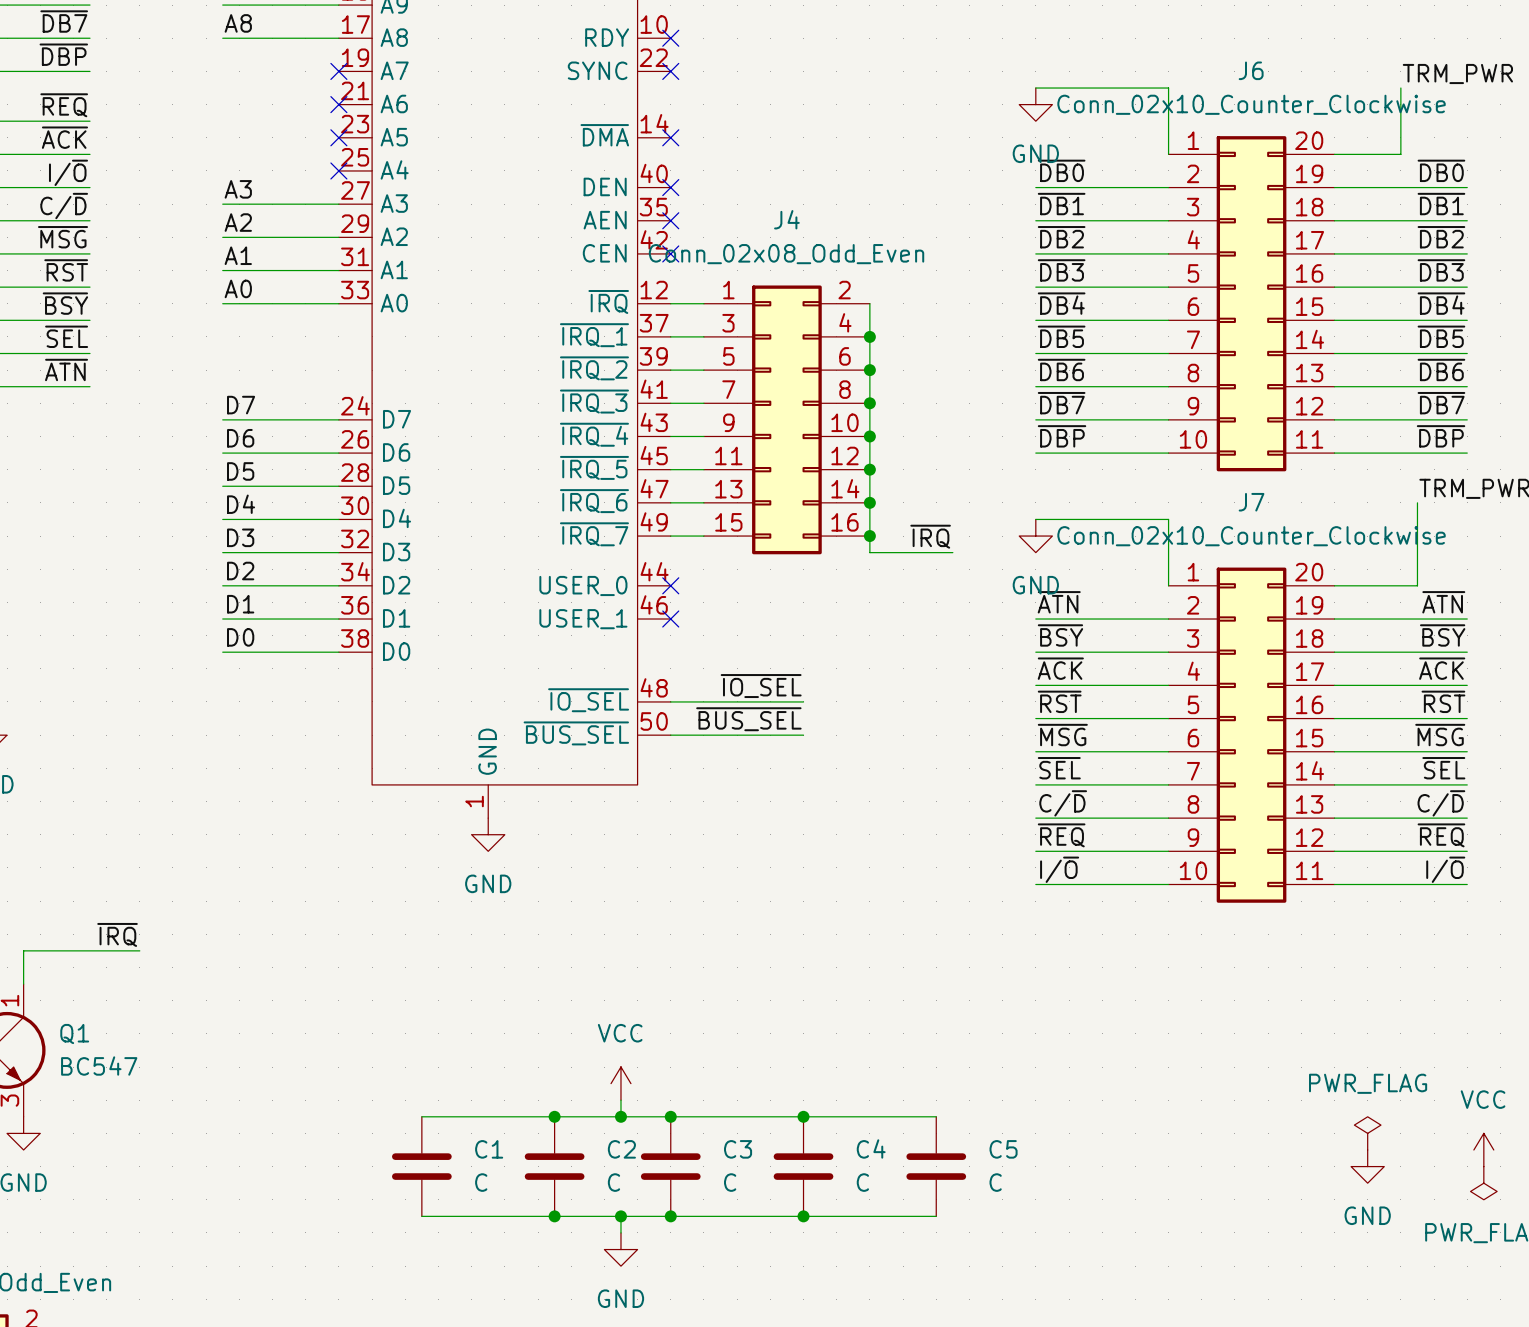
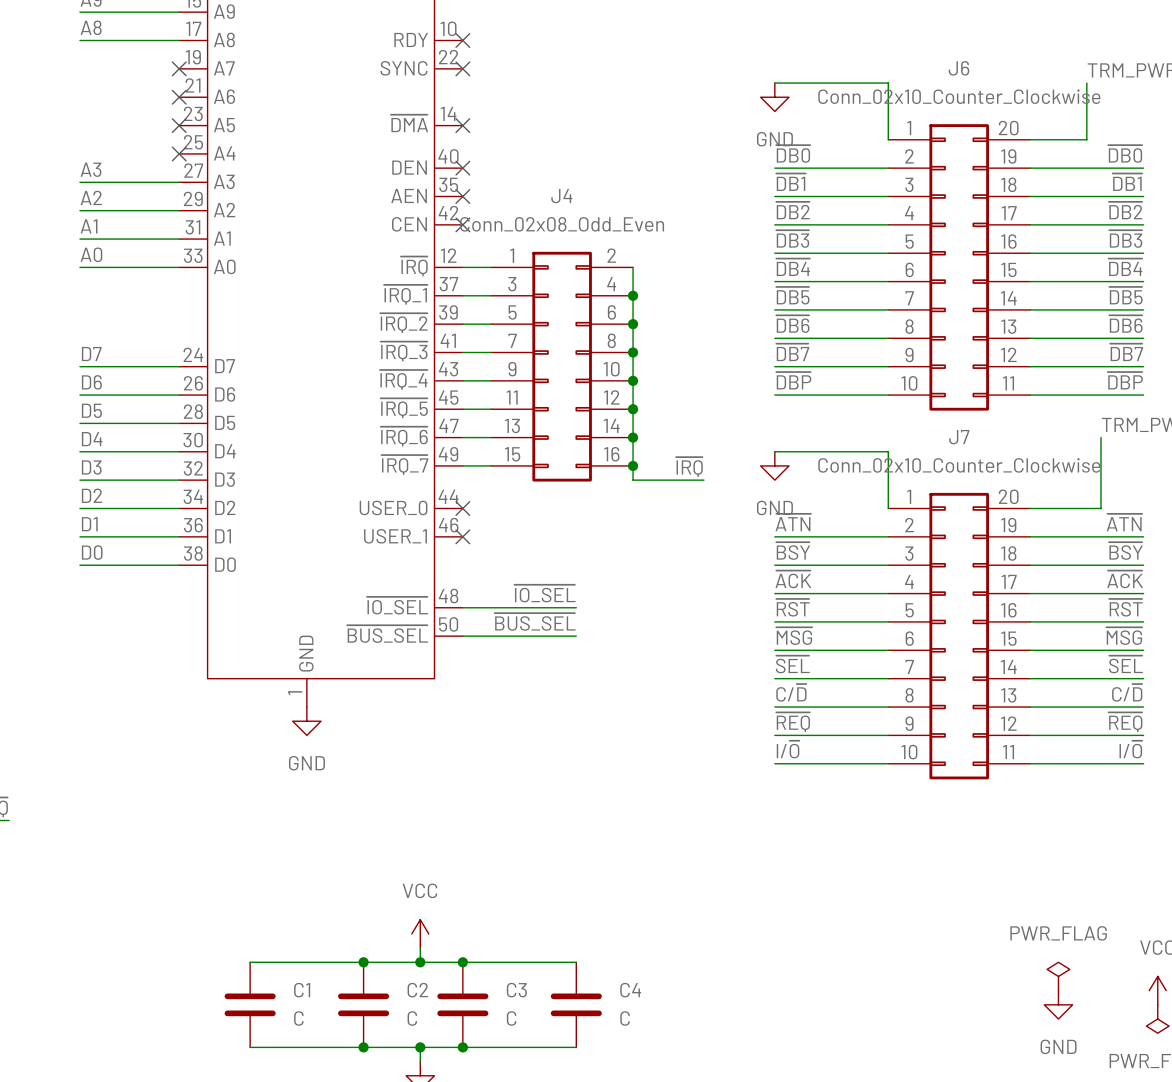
wire: (803, 1116) (936, 1116) -> none
junction: (803, 1116) -> none
C5: C (936, 1166) -> none
wire: (803, 1216) (936, 1216) -> none
junction: (803, 1216) -> none

